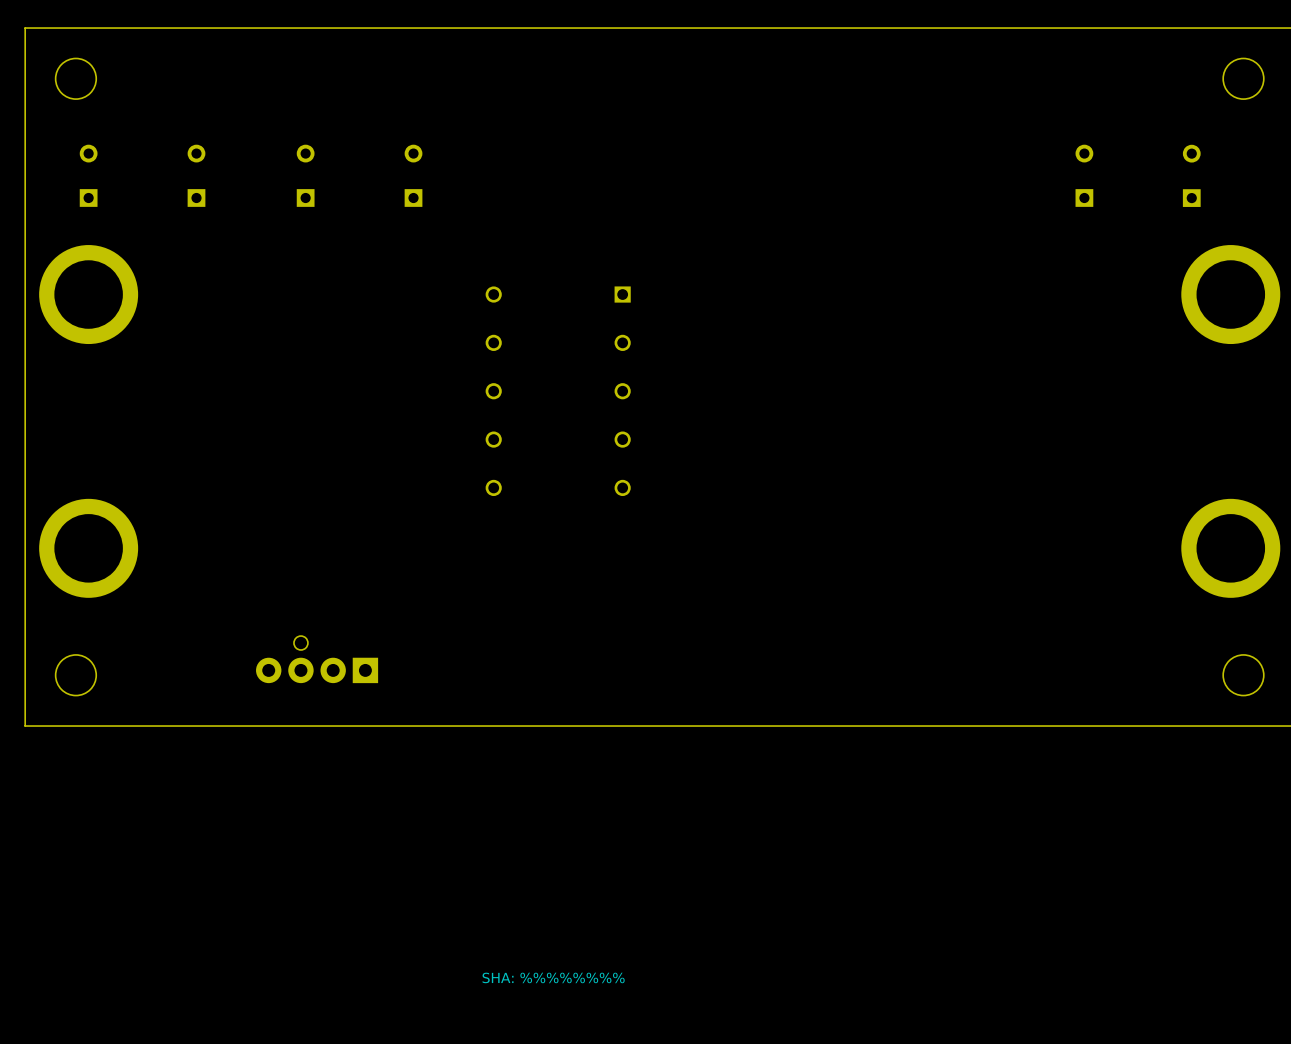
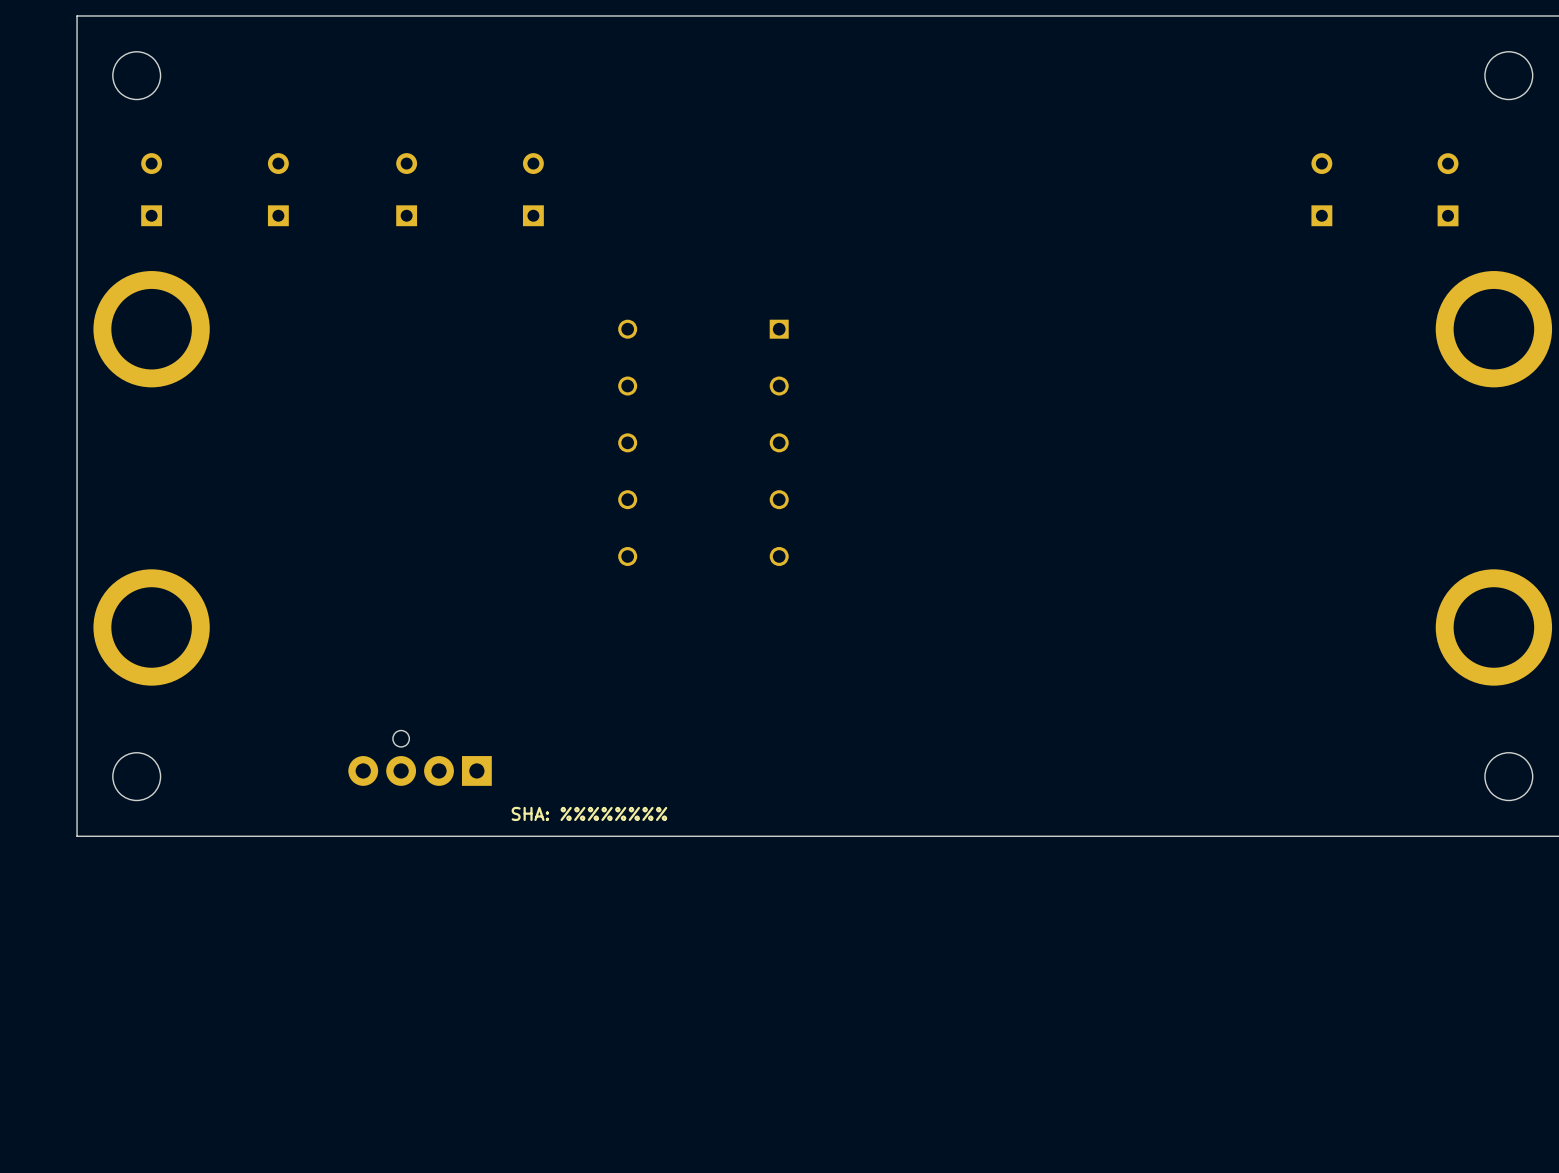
text position: SHA: %%%%%%%% (553, 977) -> SHA: %%%%%%%% (589, 813)

